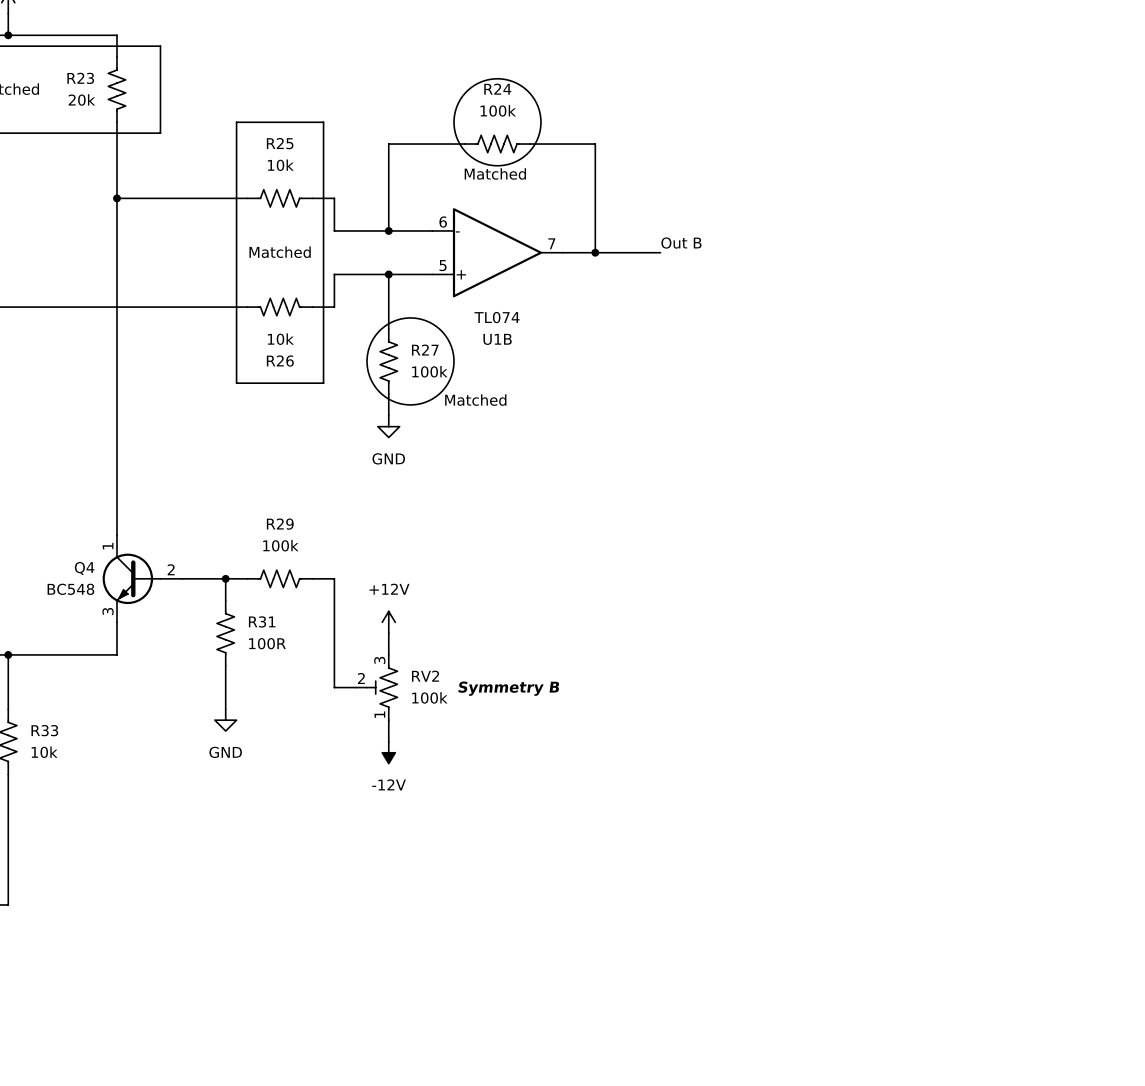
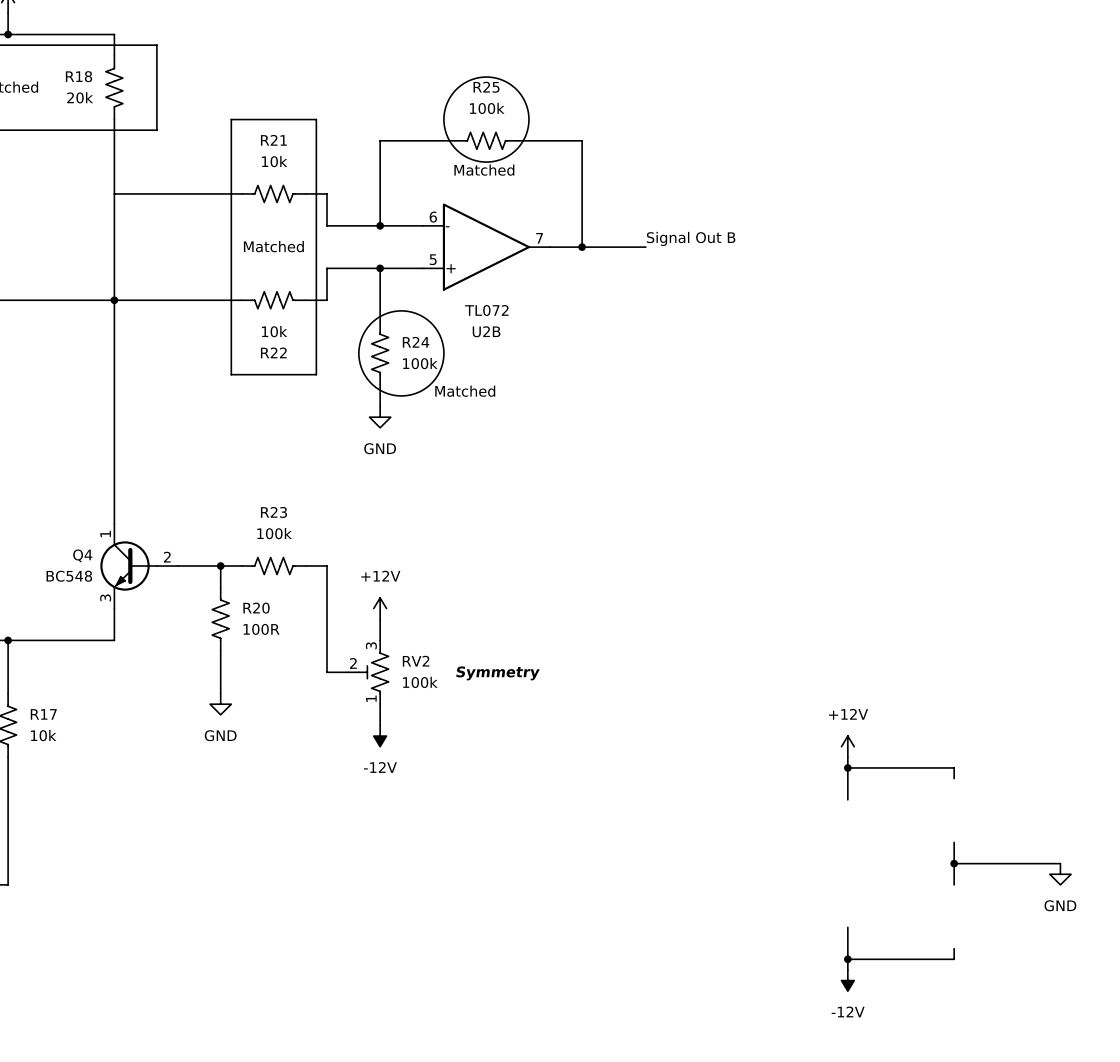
R23 name: R23 (80, 78) -> R18 (79, 76)
R24 name: R24 (497, 89) -> R25 (486, 87)
R25 name: R25 (280, 143) -> R21 (273, 140)
junction: (116, 198) -> none
label: Out B (681, 243) -> Signal Out B (691, 238)
junction: none -> (114, 300)
U1B value: TL074 (497, 317) -> TL072 (486, 310)
U1B name: U1B (497, 339) -> U2B (486, 331)
R27 name: R27 (425, 350) -> R24 (416, 342)
R26 name: R26 (280, 361) -> R22 (273, 352)
R29 name: R29 (280, 524) -> R23 (273, 512)
R31 name: R31 (262, 621) -> R20 (256, 608)
RV2 text: Symmetry B (508, 688) -> Symmetry (498, 673)
R33 name: R33 (44, 730) -> R17 (43, 714)
power symbol: none -> +12V (847, 746)
wire: none -> (847, 757) (847, 799)
wire: none -> (847, 767) (954, 767) (954, 778)
junction: none -> (847, 767)
wire: none -> (954, 842) (954, 884)
wire: none -> (954, 863) (1060, 863)
junction: none -> (954, 863)
power symbol: none -> GND (1060, 874)
wire: none -> (847, 927) (847, 969)
wire: none -> (954, 948) (954, 959) (847, 959)
junction: none -> (847, 959)
power symbol: none -> -12V (847, 980)

